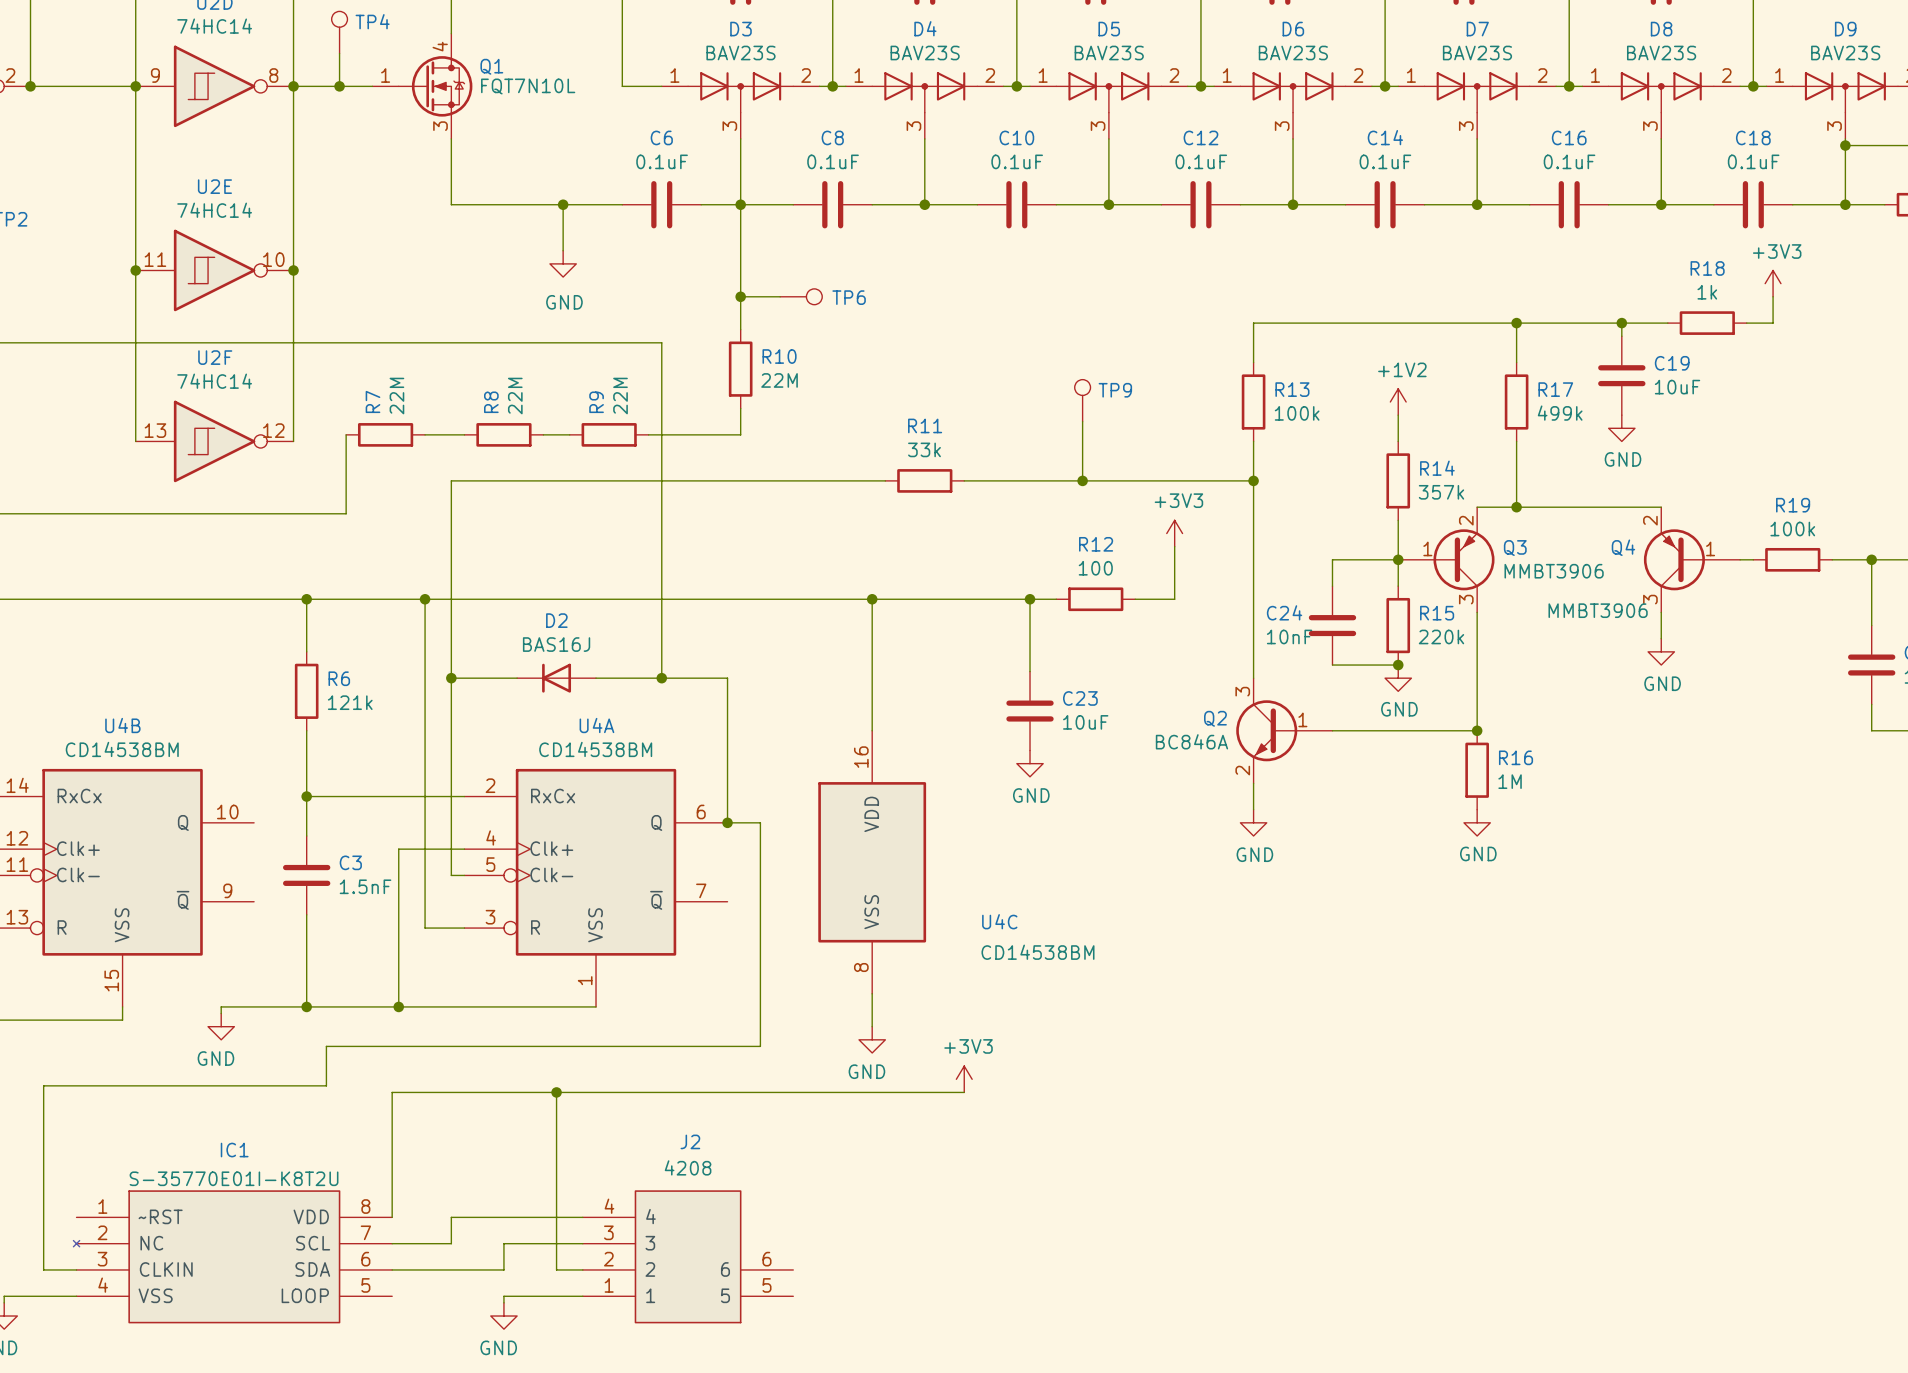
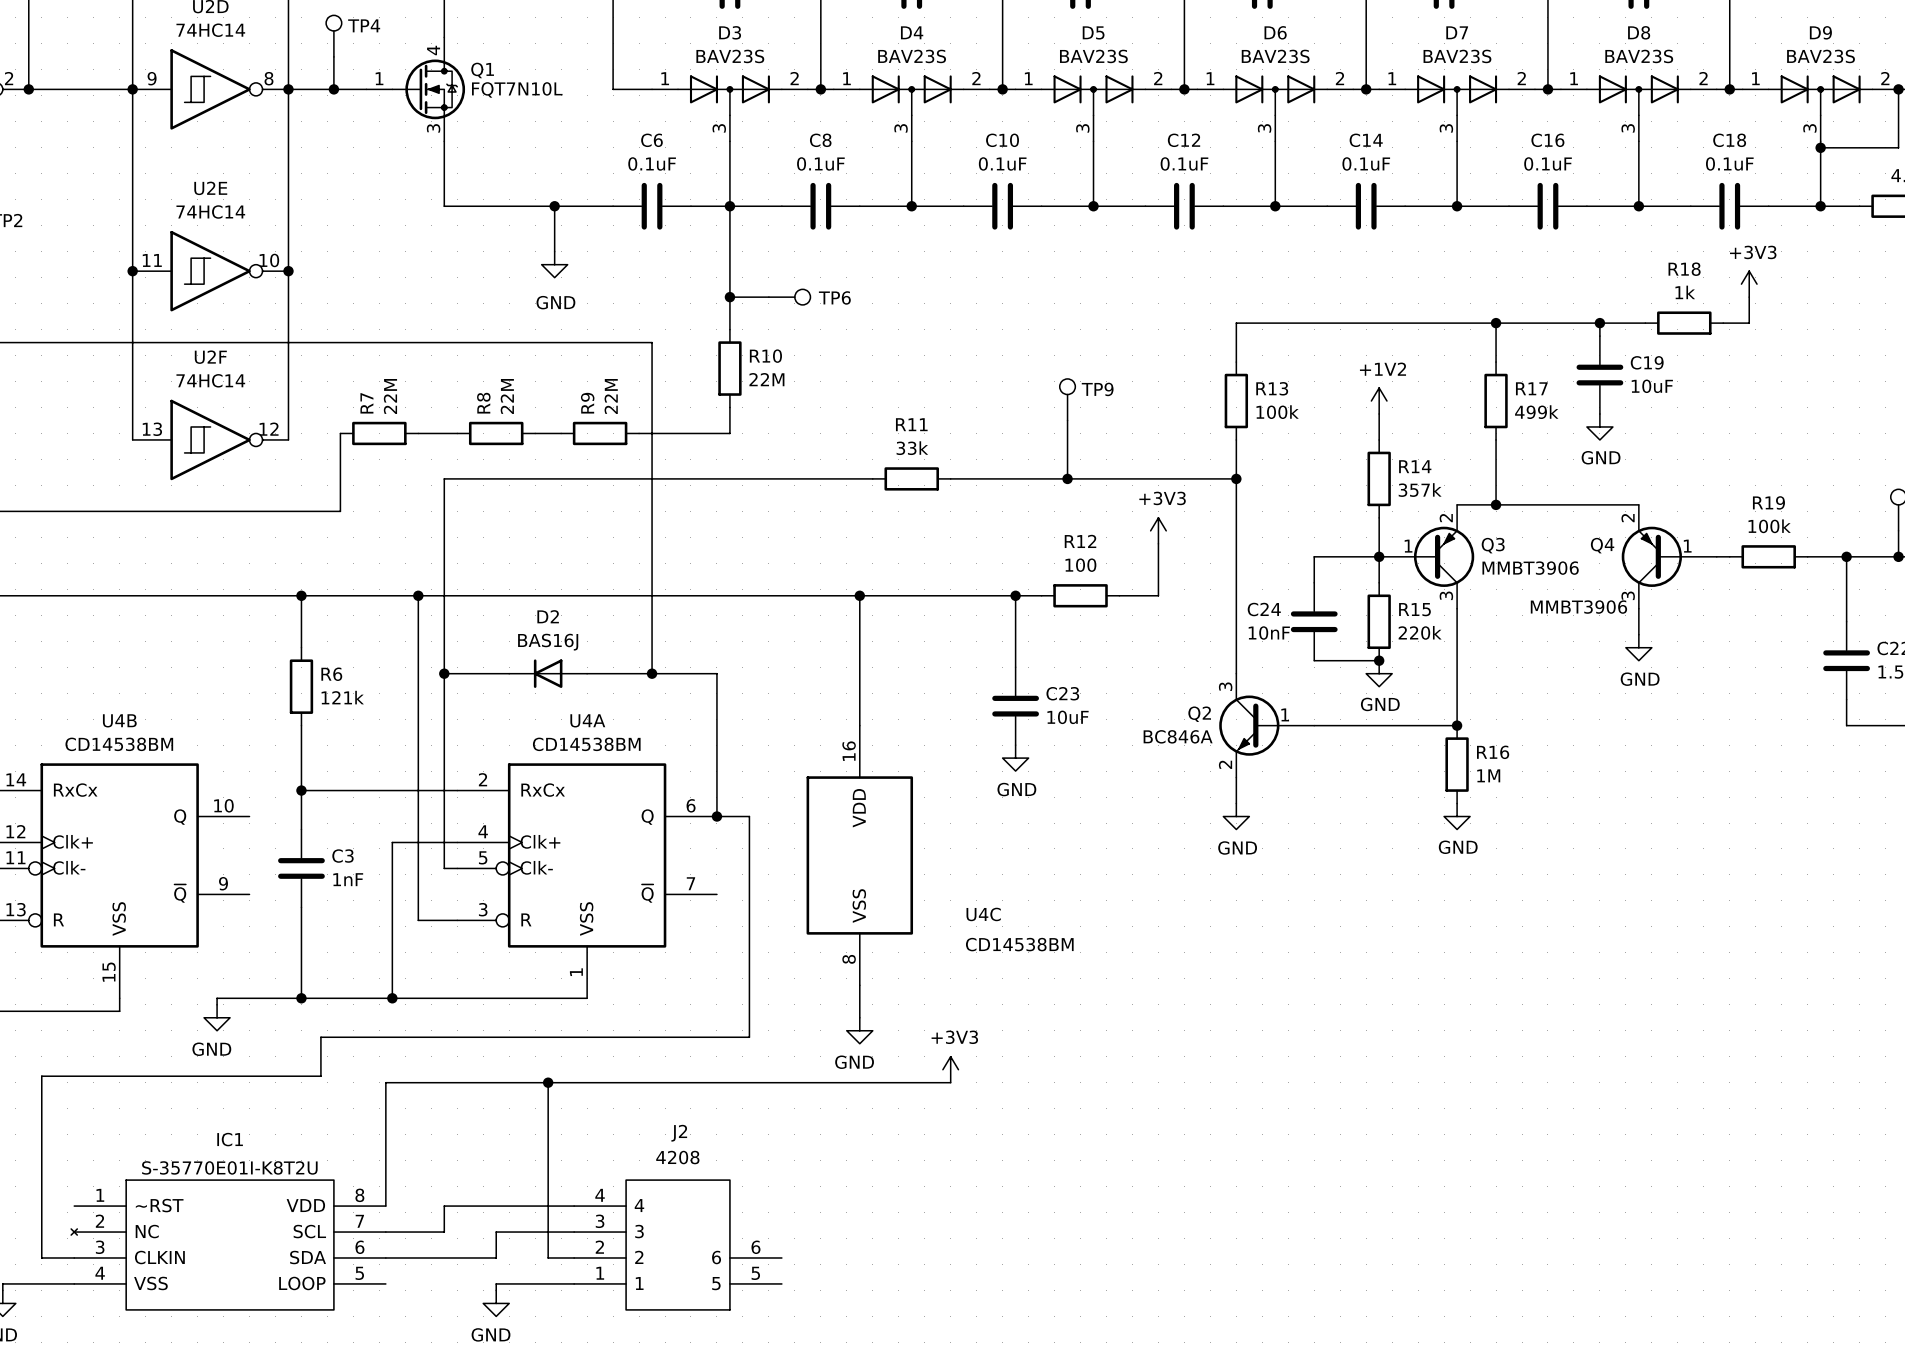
C3 value: 1.5nF (365, 886) -> 1nF (348, 879)

